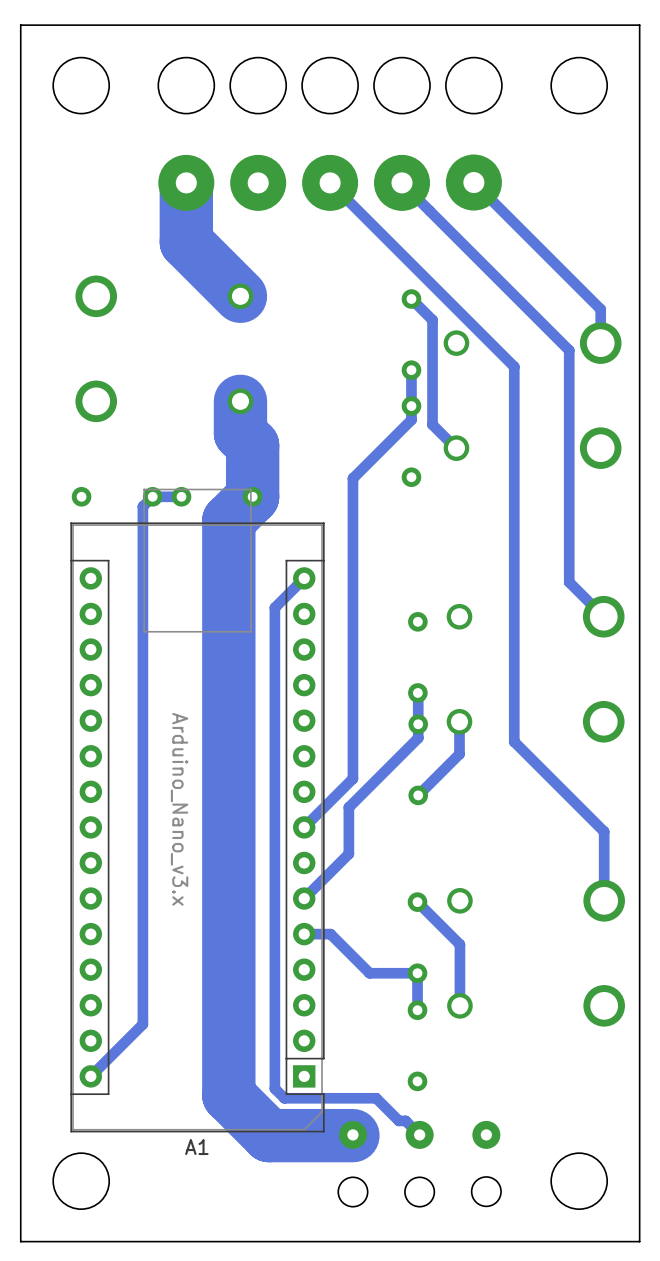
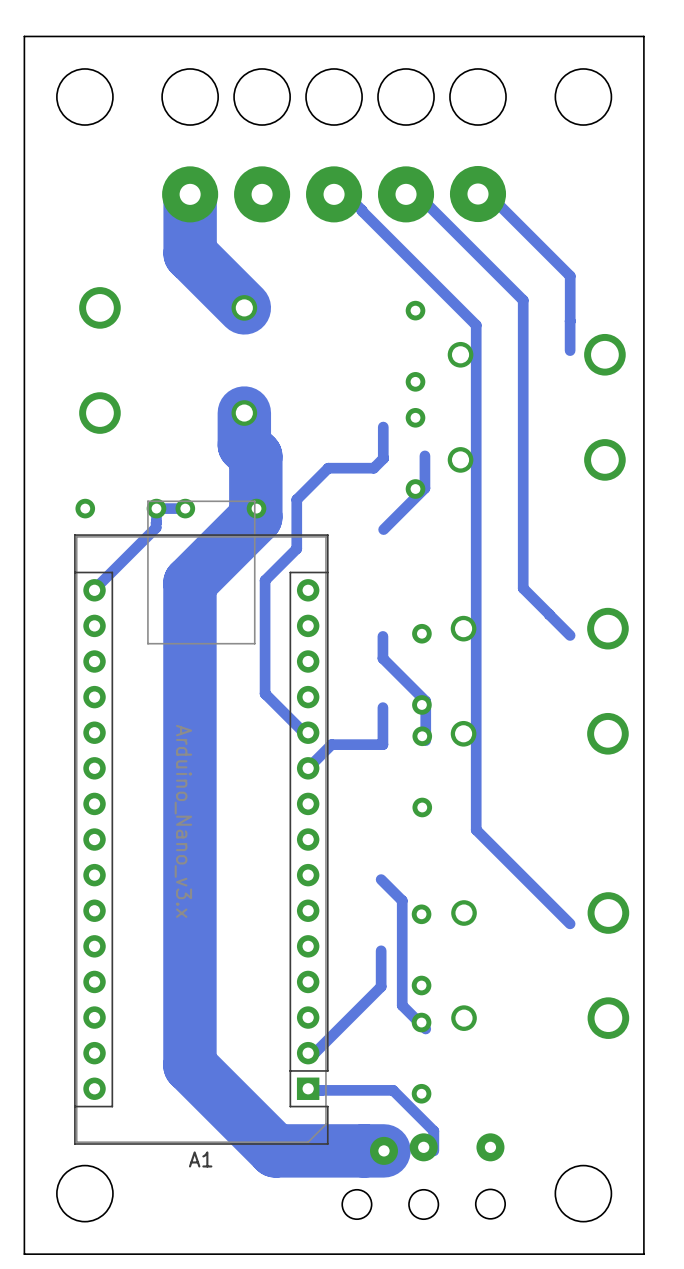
track: none -> (334, 182) (476, 325) (476, 829) (570, 923)
track: none -> (405, 182) (523, 300) (523, 588) (549, 614)
track: none -> (476, 182) (570, 276) (570, 350)
track: (330, 182) (514, 366) (514, 741) (604, 831) (604, 900) -> none
track: (401, 182) (569, 350) (569, 582) (603, 616) -> none
track: (473, 182) (600, 309) (600, 343) -> none
track: (411, 299) (432, 320) (432, 424) (456, 448) -> none
track: (411, 370) (411, 419) (352, 478) (352, 778) (304, 827) -> none
track: none -> (383, 427) (383, 458) (373, 468) (328, 468) (296, 499) (296, 548) (265, 580) (265, 693) (305, 734)
track: (251, 444) (252, 496) (228, 520) (228, 1095) (269, 1135) (352, 1135) -> (255, 456) (255, 517) (189, 583) (189, 1065) (275, 1150) (383, 1150)
track: (152, 496) (142, 506) (142, 1024) (90, 1076) -> (156, 508) (156, 527) (92, 591)
track: (304, 578) (274, 607) (274, 1088) (284, 1098) (376, 1098) (398, 1120) (405, 1120) (419, 1134) -> none
track: none -> (549, 614) (570, 635)
track: none -> (382, 636) (382, 658) (425, 701) (425, 740)
track: (417, 692) (418, 738) (348, 807) (348, 853) (304, 898) -> none
track: none -> (382, 707) (382, 744) (331, 744) (308, 768)
track: (459, 721) (459, 754) (418, 795) -> (424, 455) (424, 488) (383, 529)
track: none -> (381, 879) (402, 900) (402, 1005) (425, 1029)
track: (417, 902) (459, 944) (459, 1005) -> none
track: (304, 934) (330, 934) (369, 973) (417, 973) (417, 1010) -> none
track: none -> (381, 950) (381, 986) (314, 1052) (308, 1052)
track: none -> (305, 1090) (393, 1090) (433, 1131) (433, 1150)
part position: (352, 1134) -> (383, 1150)

